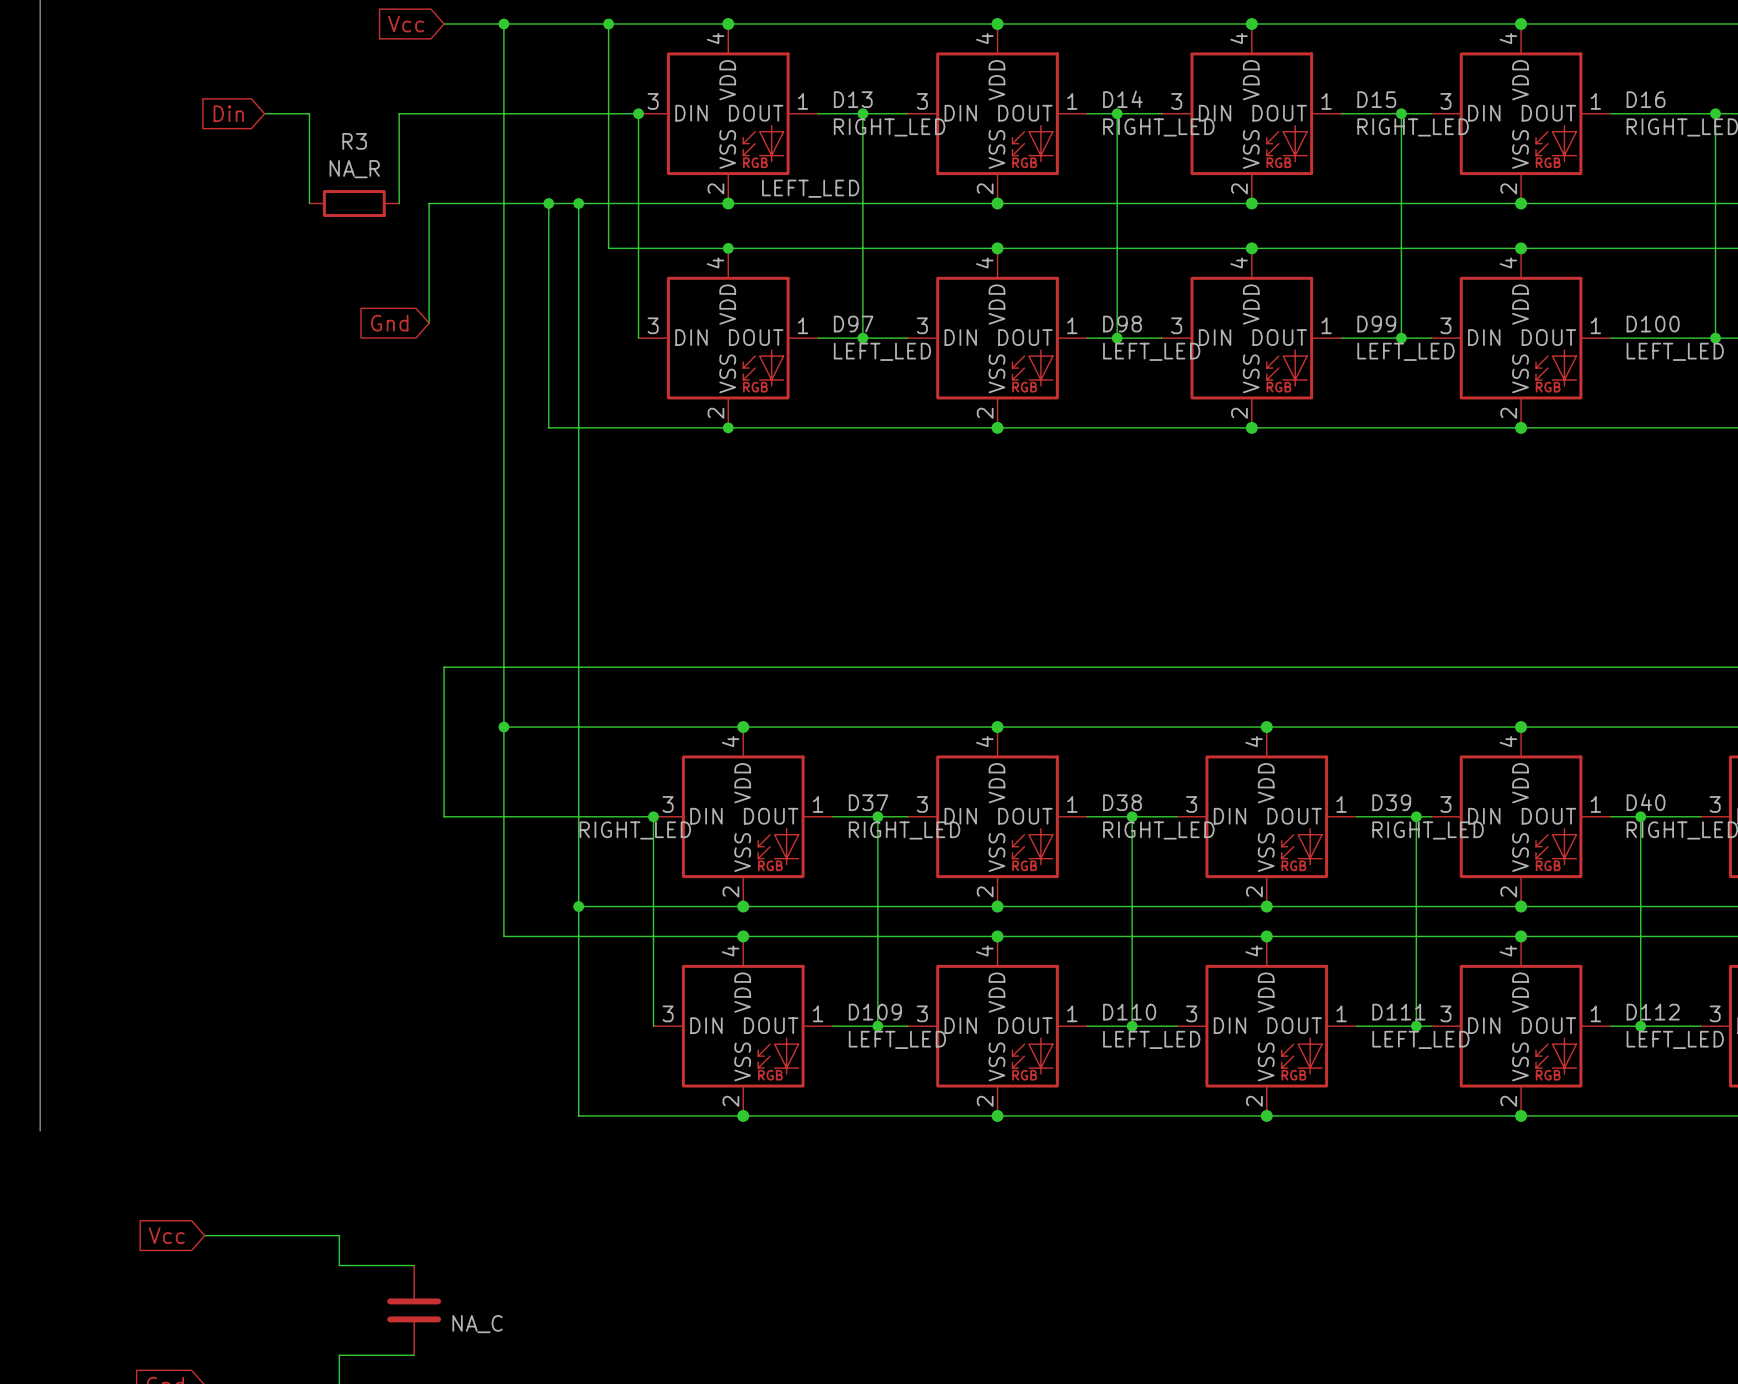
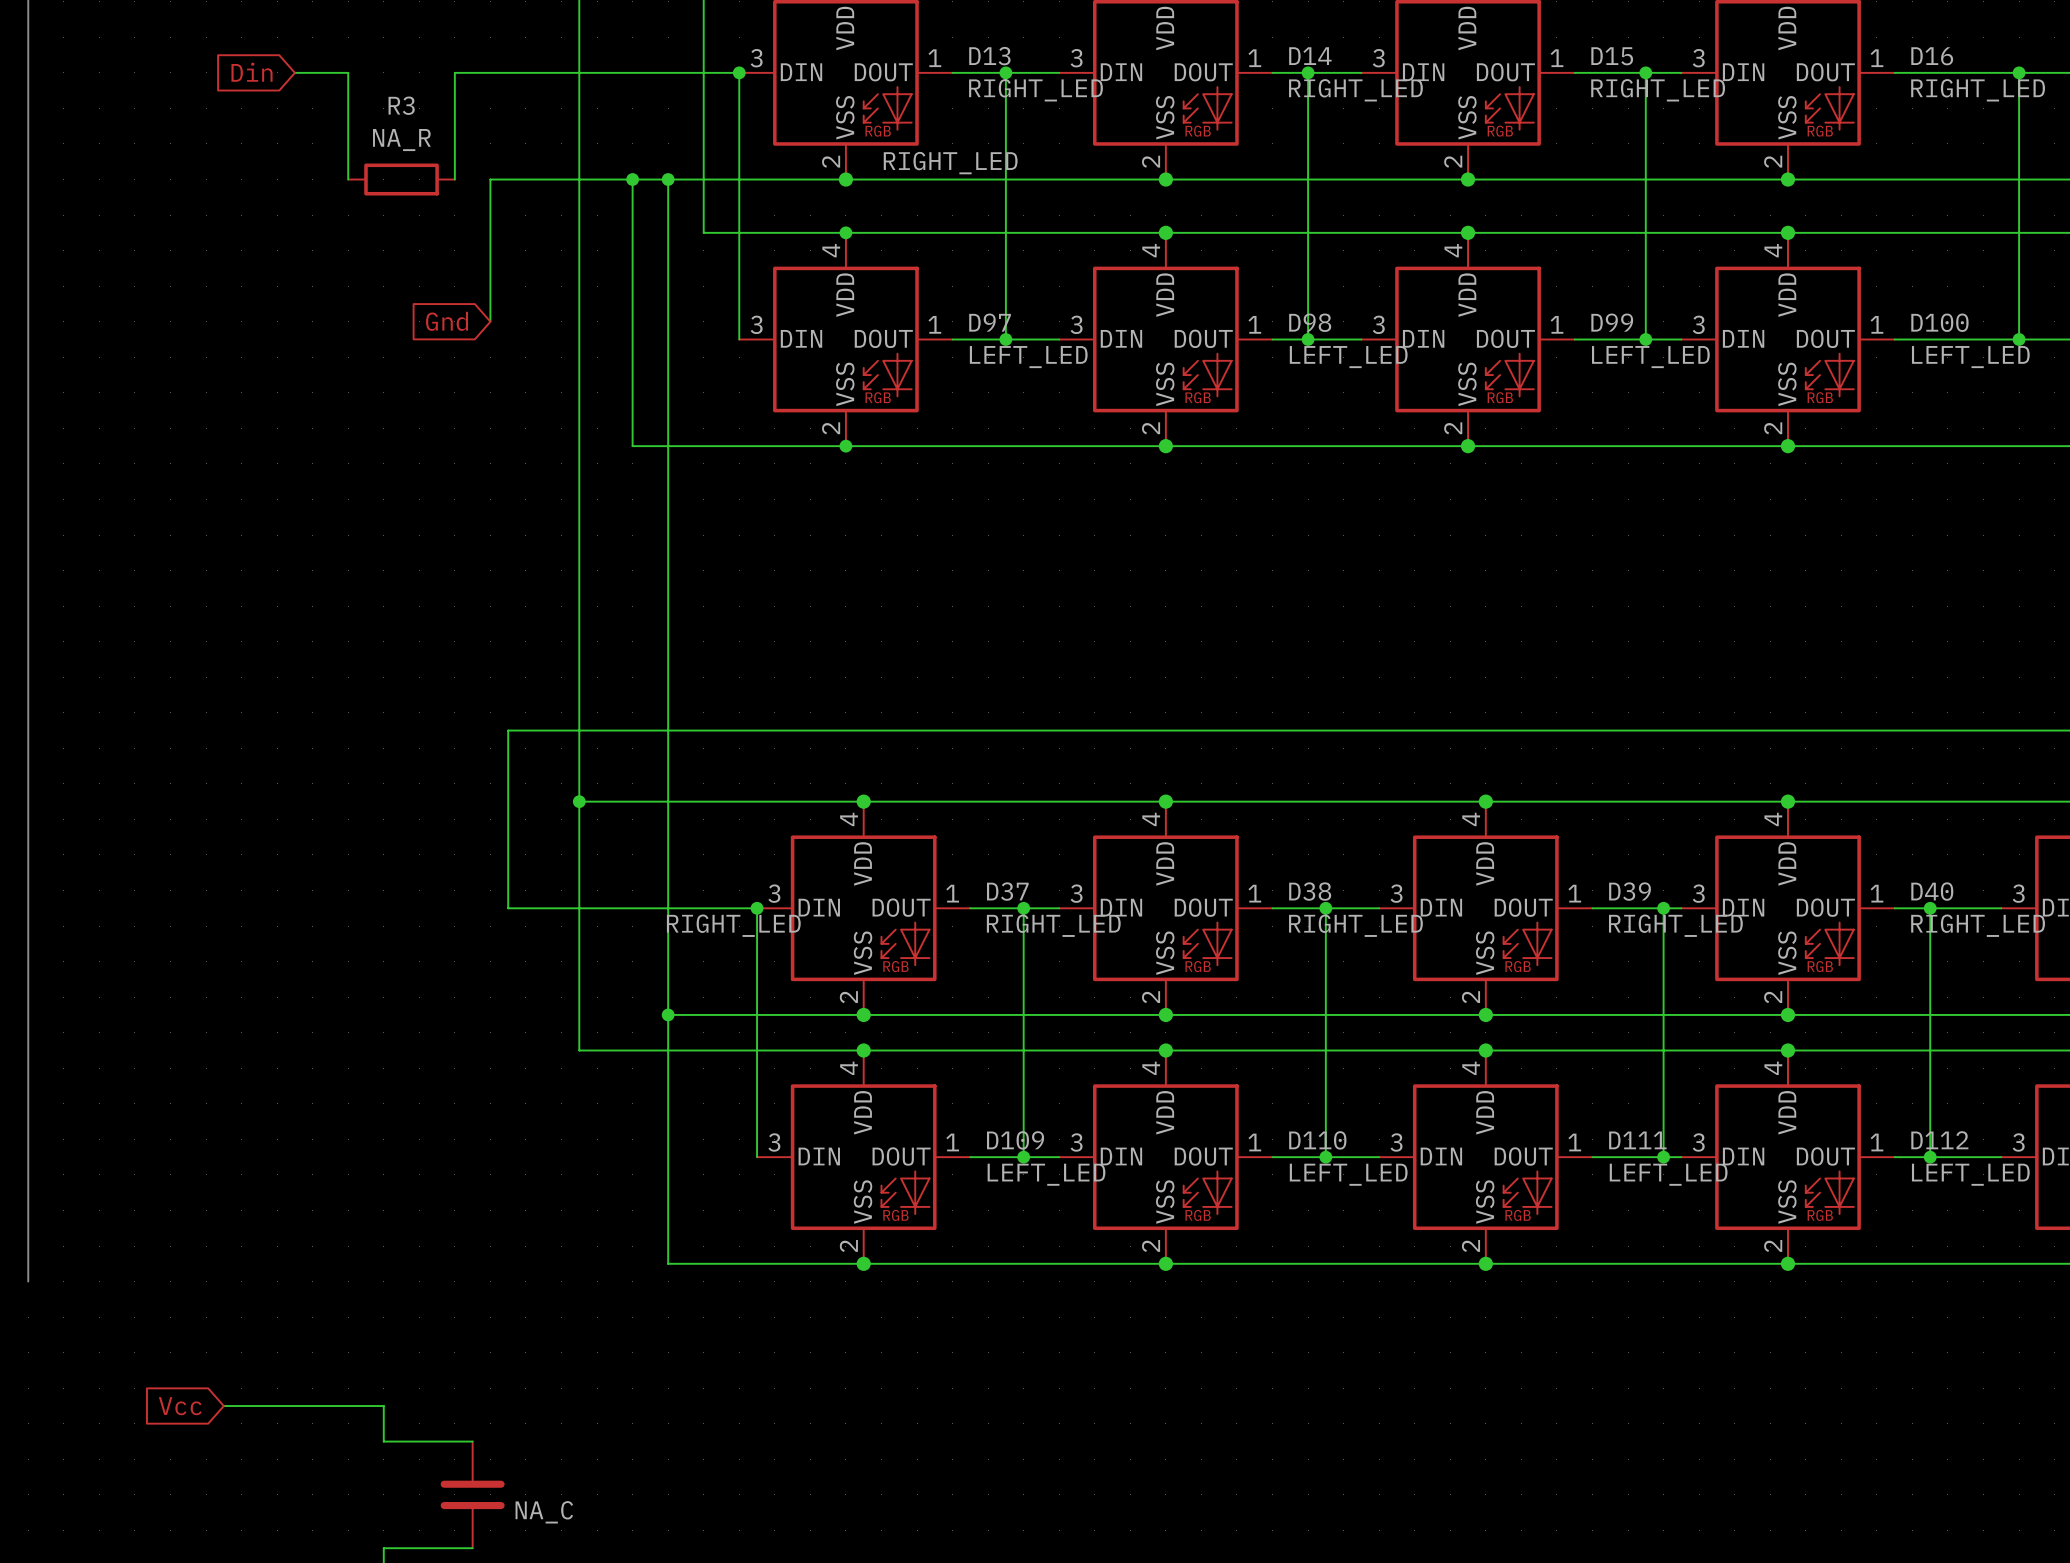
part value: LEFT_LED (810, 188) -> RIGHT_LED (950, 163)

